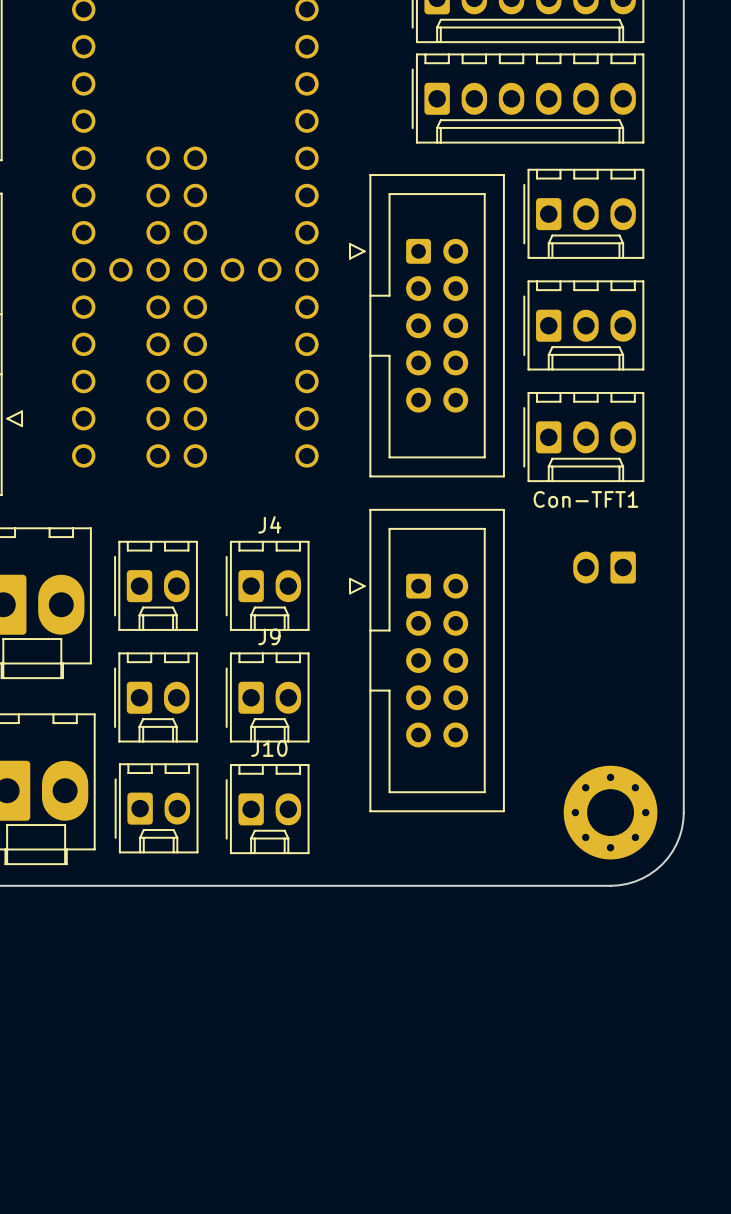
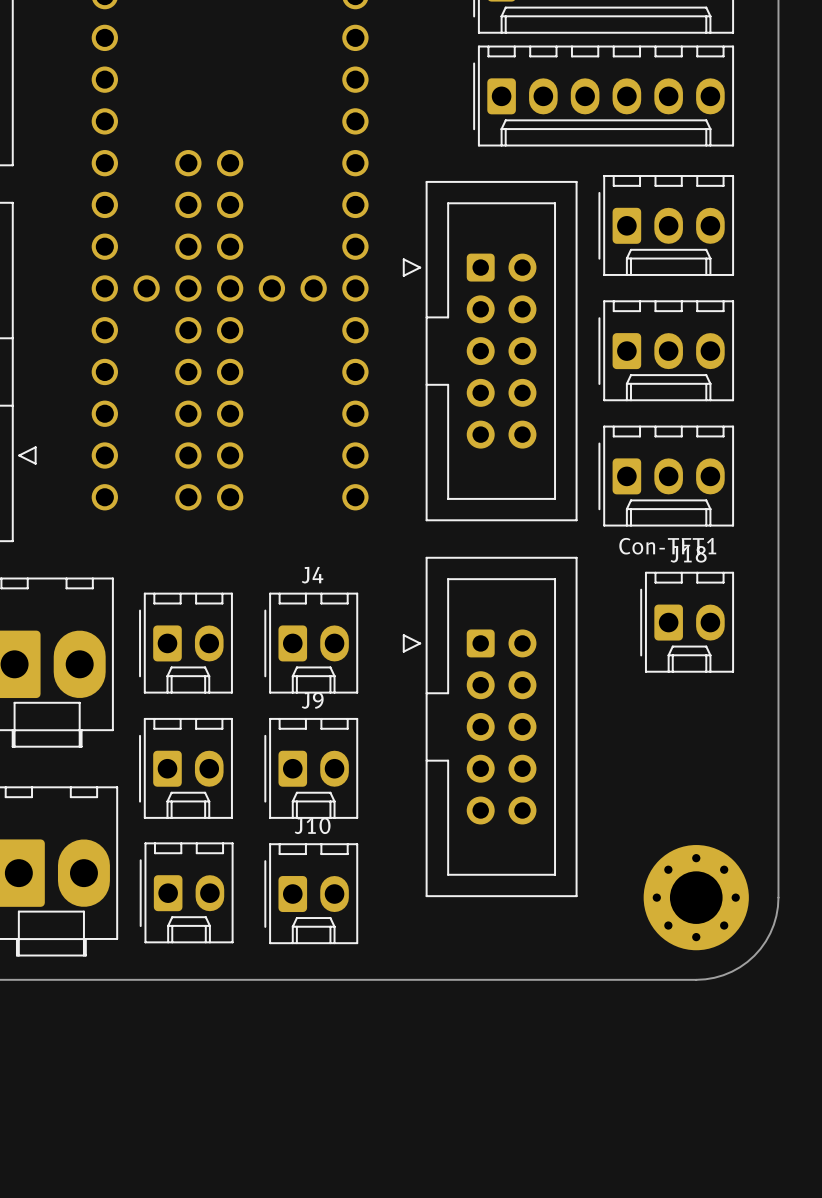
J18 side: top (604, 567) -> bottom (687, 622)

